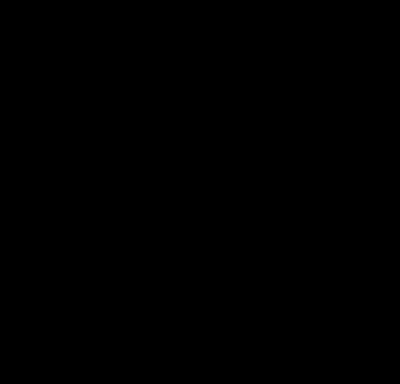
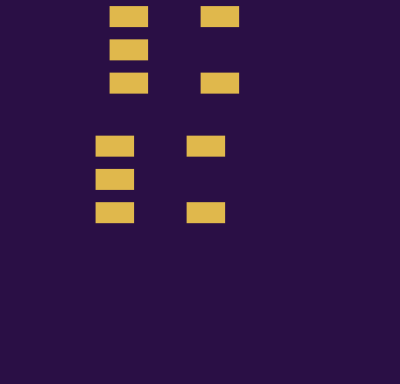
part: none -> (174, 49)
part: none -> (160, 179)

